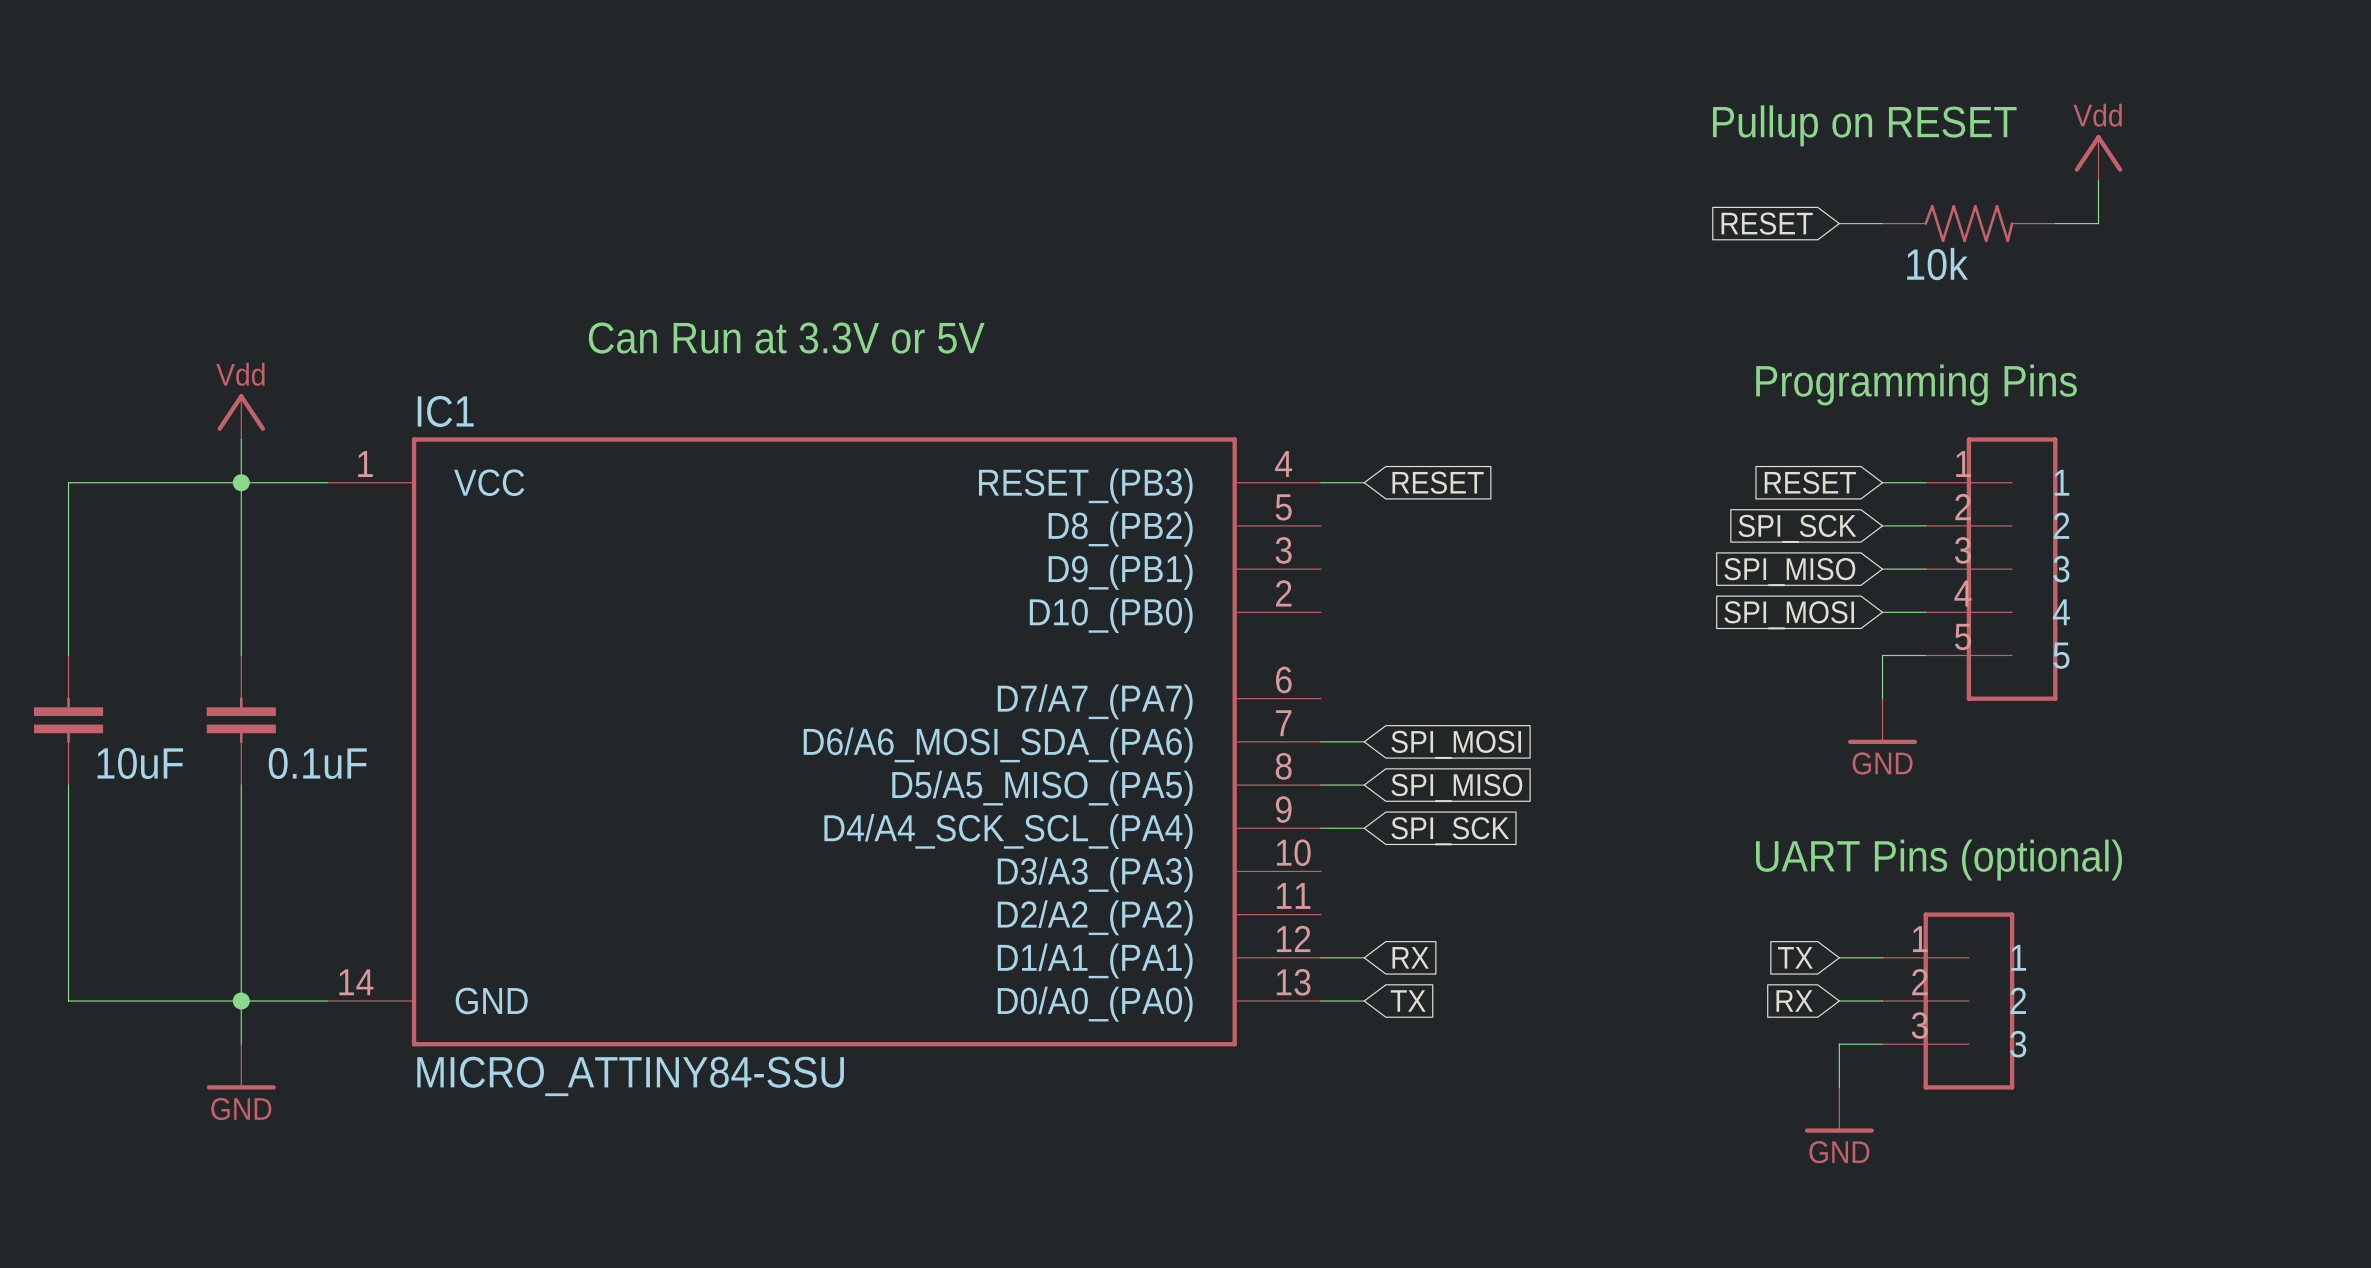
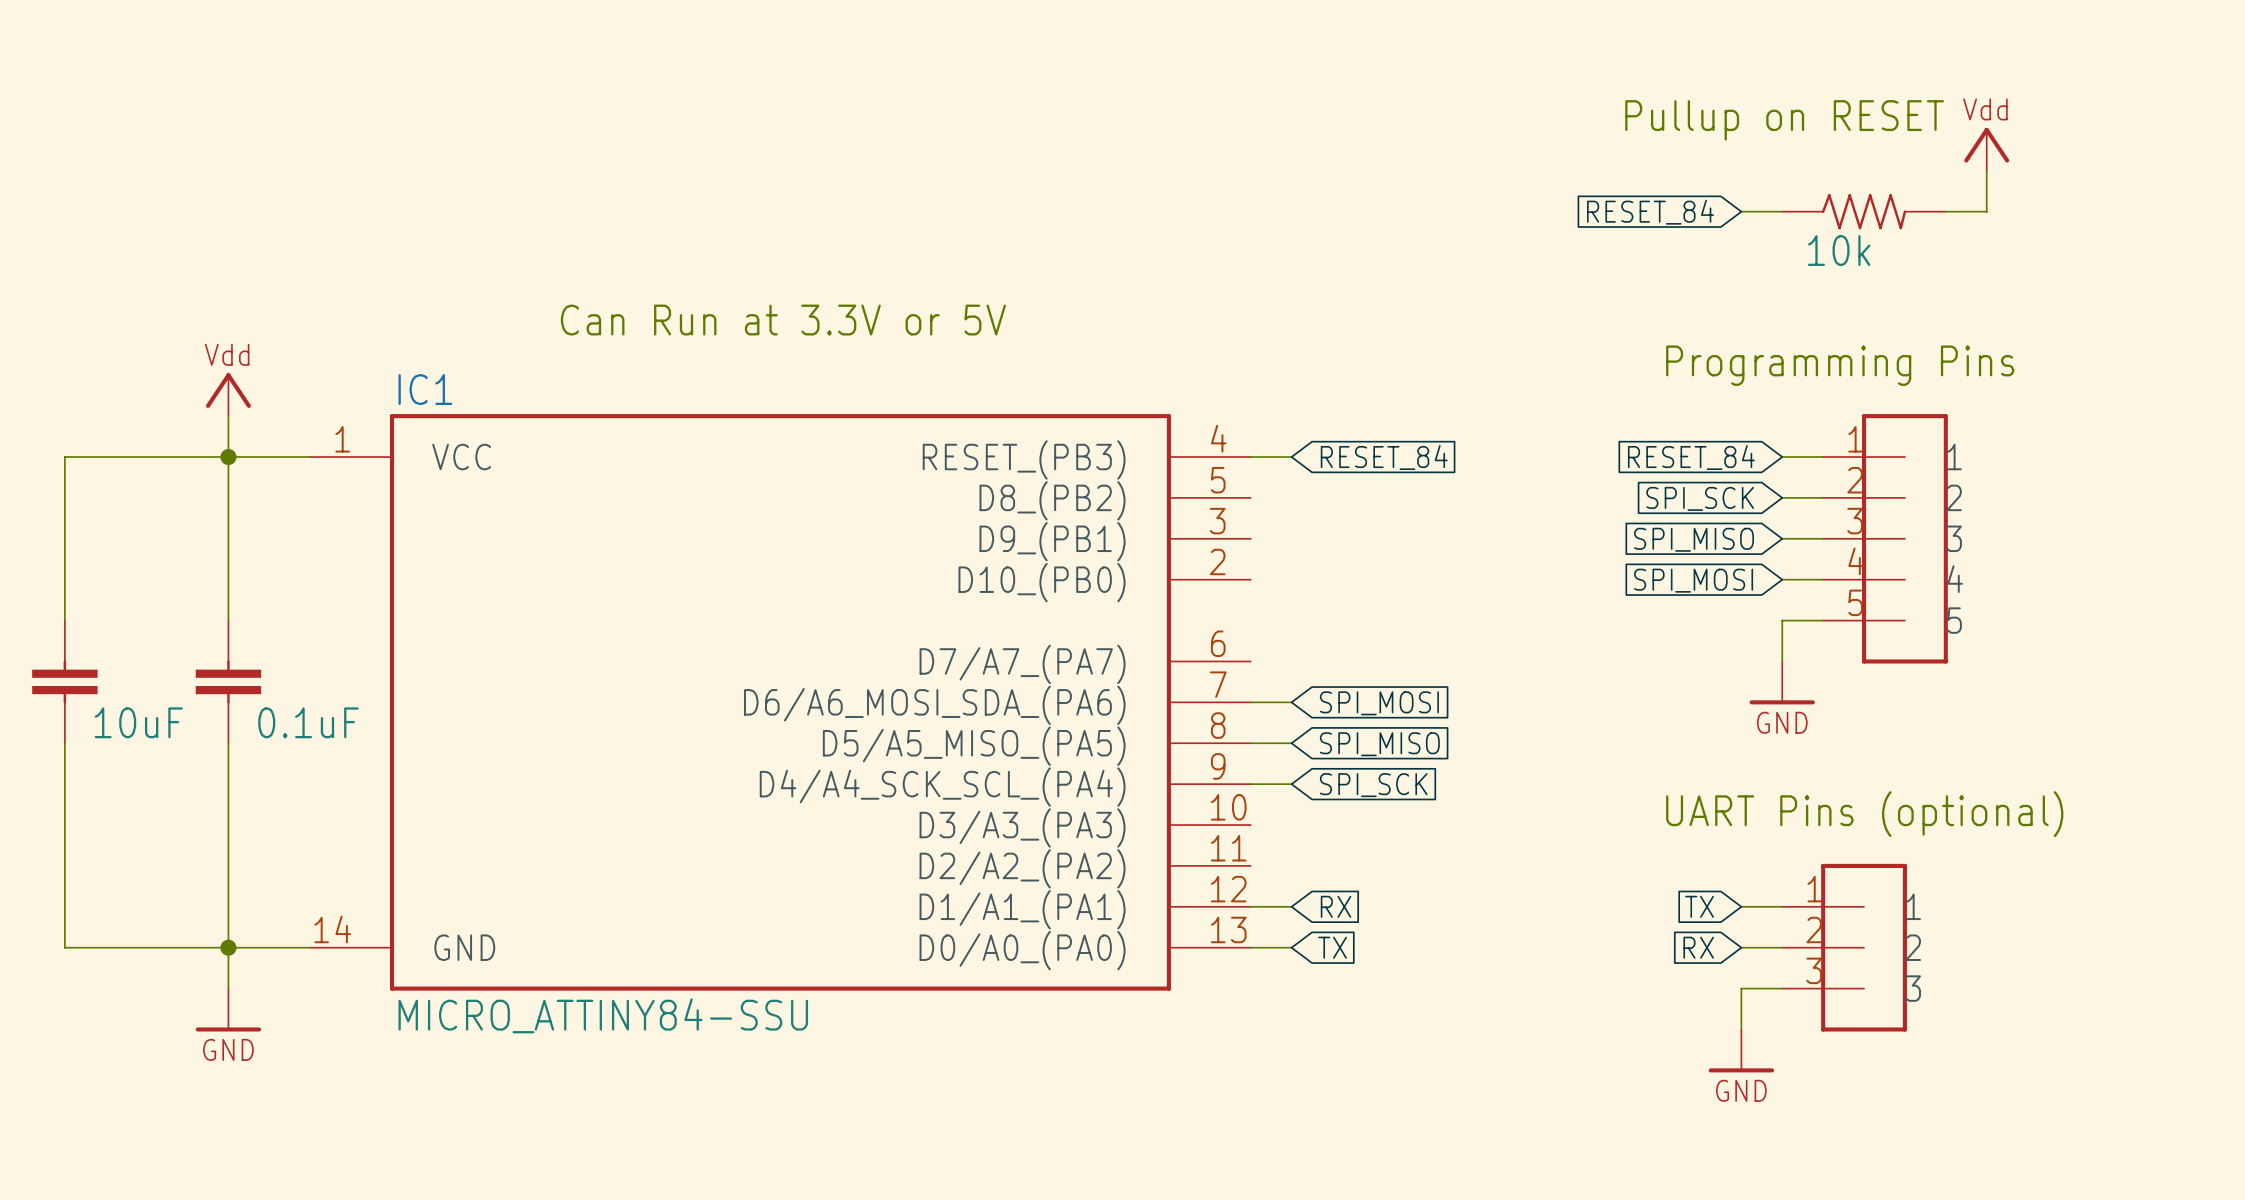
global label: RESET (1767, 223) -> RESET_84 (1650, 212)
global label: RESET (1438, 482) -> RESET_84 (1384, 457)
global label: RESET (1810, 482) -> RESET_84 (1691, 457)

